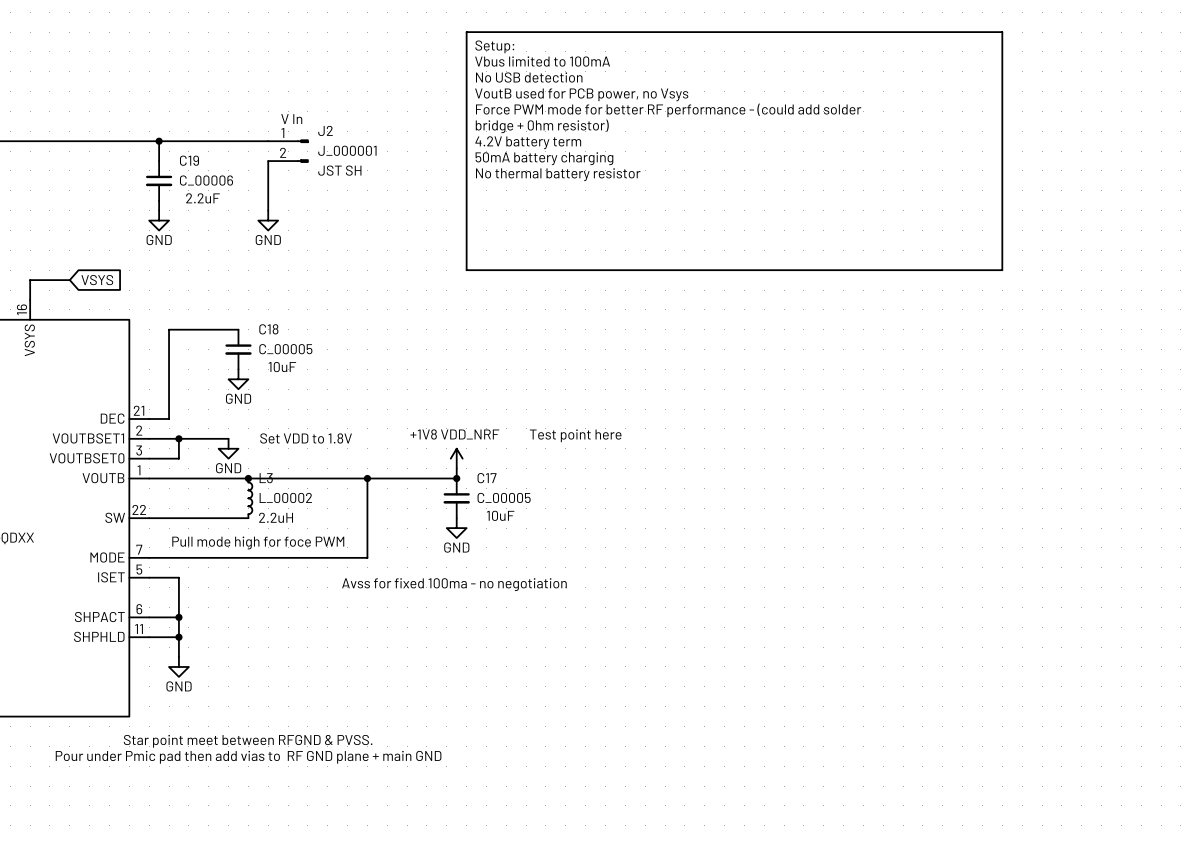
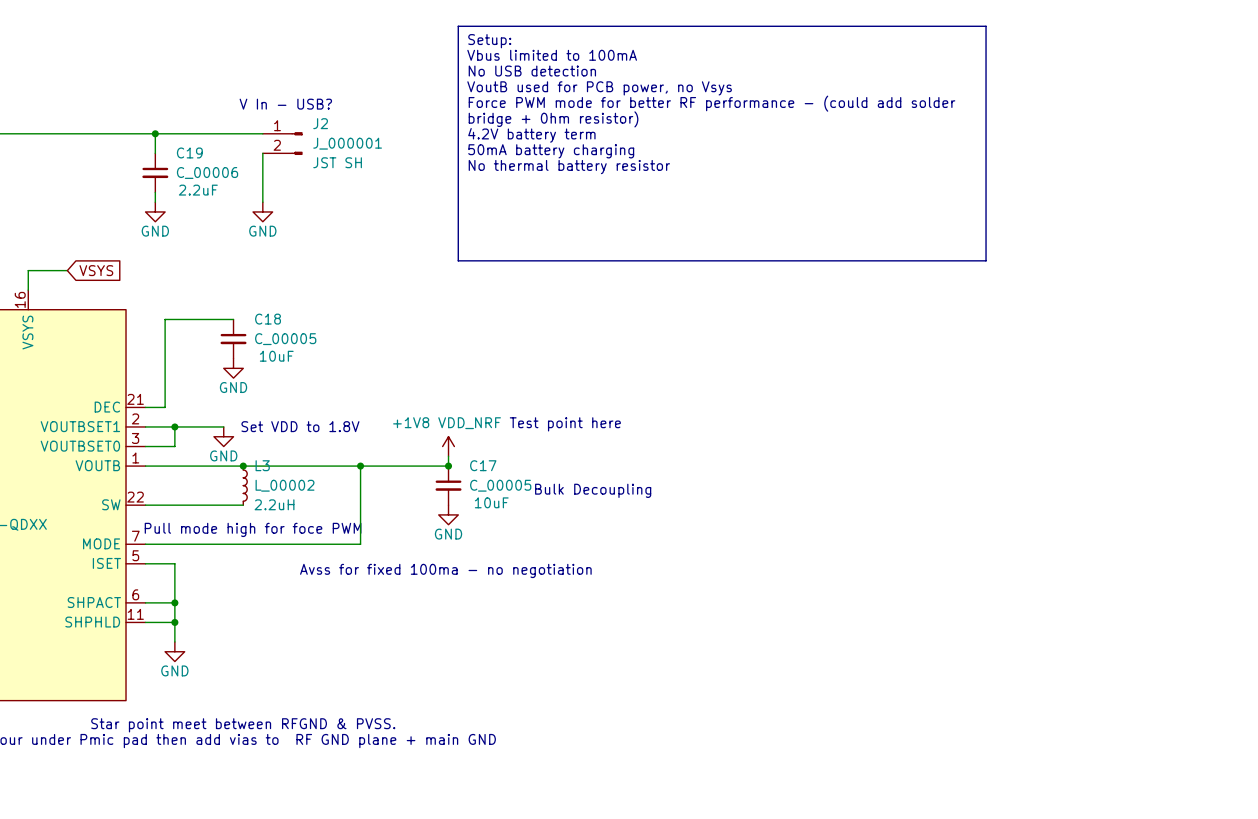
text: none -> V In - USB? (285, 104)
text: V In (291, 119) -> none
text: none -> Bulk Decoupling (593, 490)

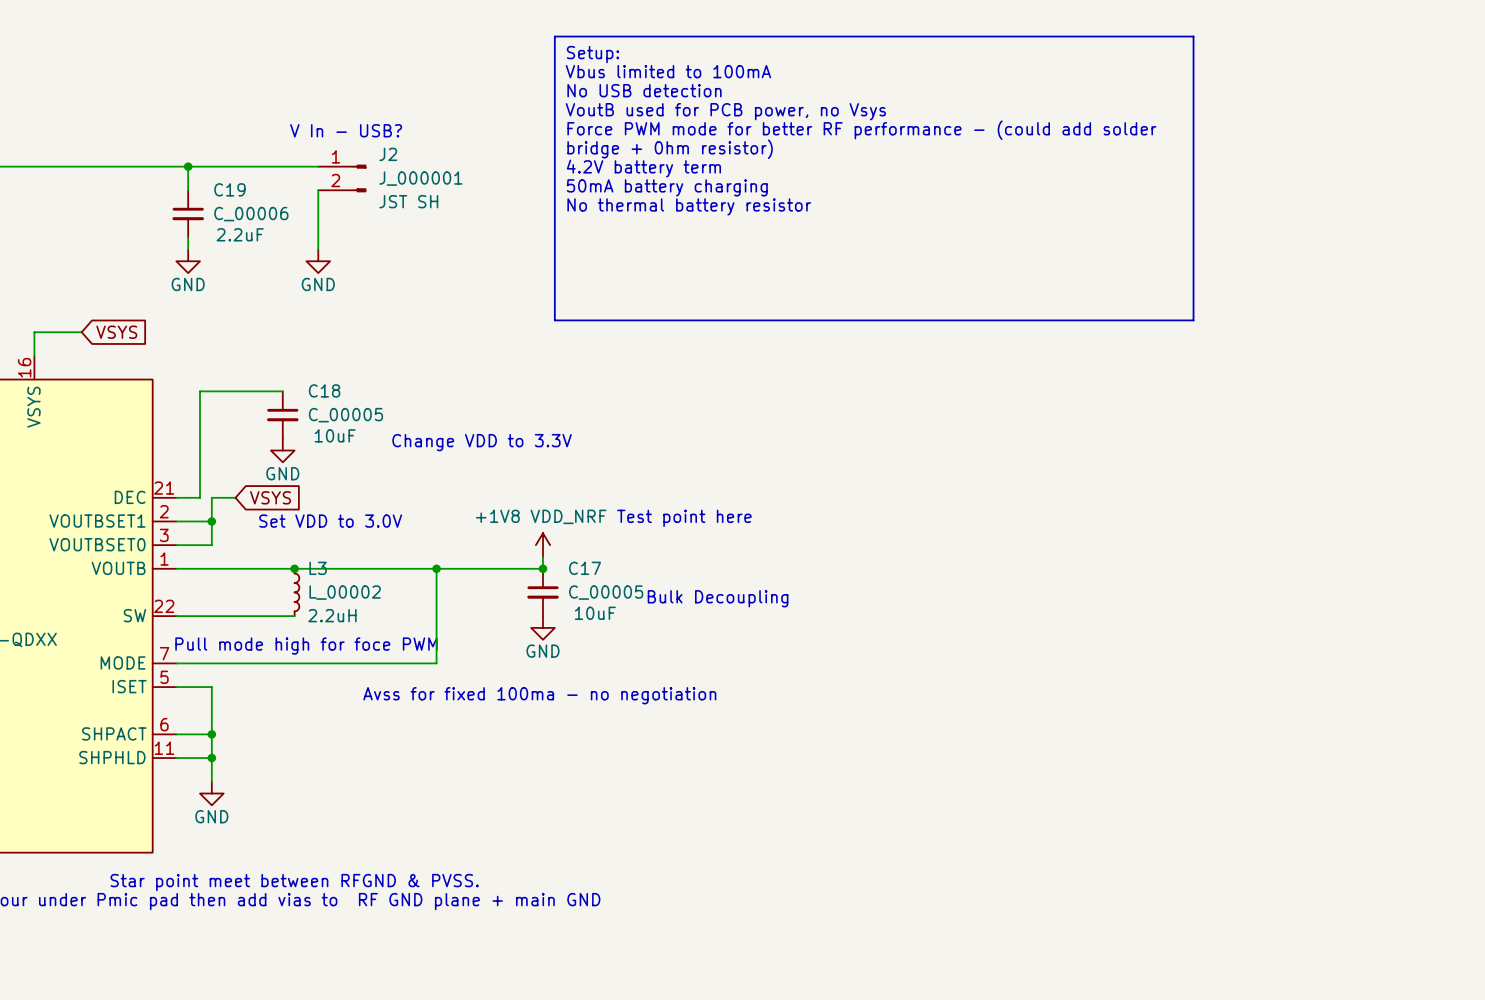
text: none -> Change VDD to 3.3V (482, 442)
global label: none -> VSYS (270, 497)
wire: (174, 426) (223, 426) -> (211, 521) (211, 497) (235, 497)
text: Set VDD to 1.8V (300, 426) -> Set VDD to 3.0V (330, 521)
power symbol: GND (223, 436) -> none

